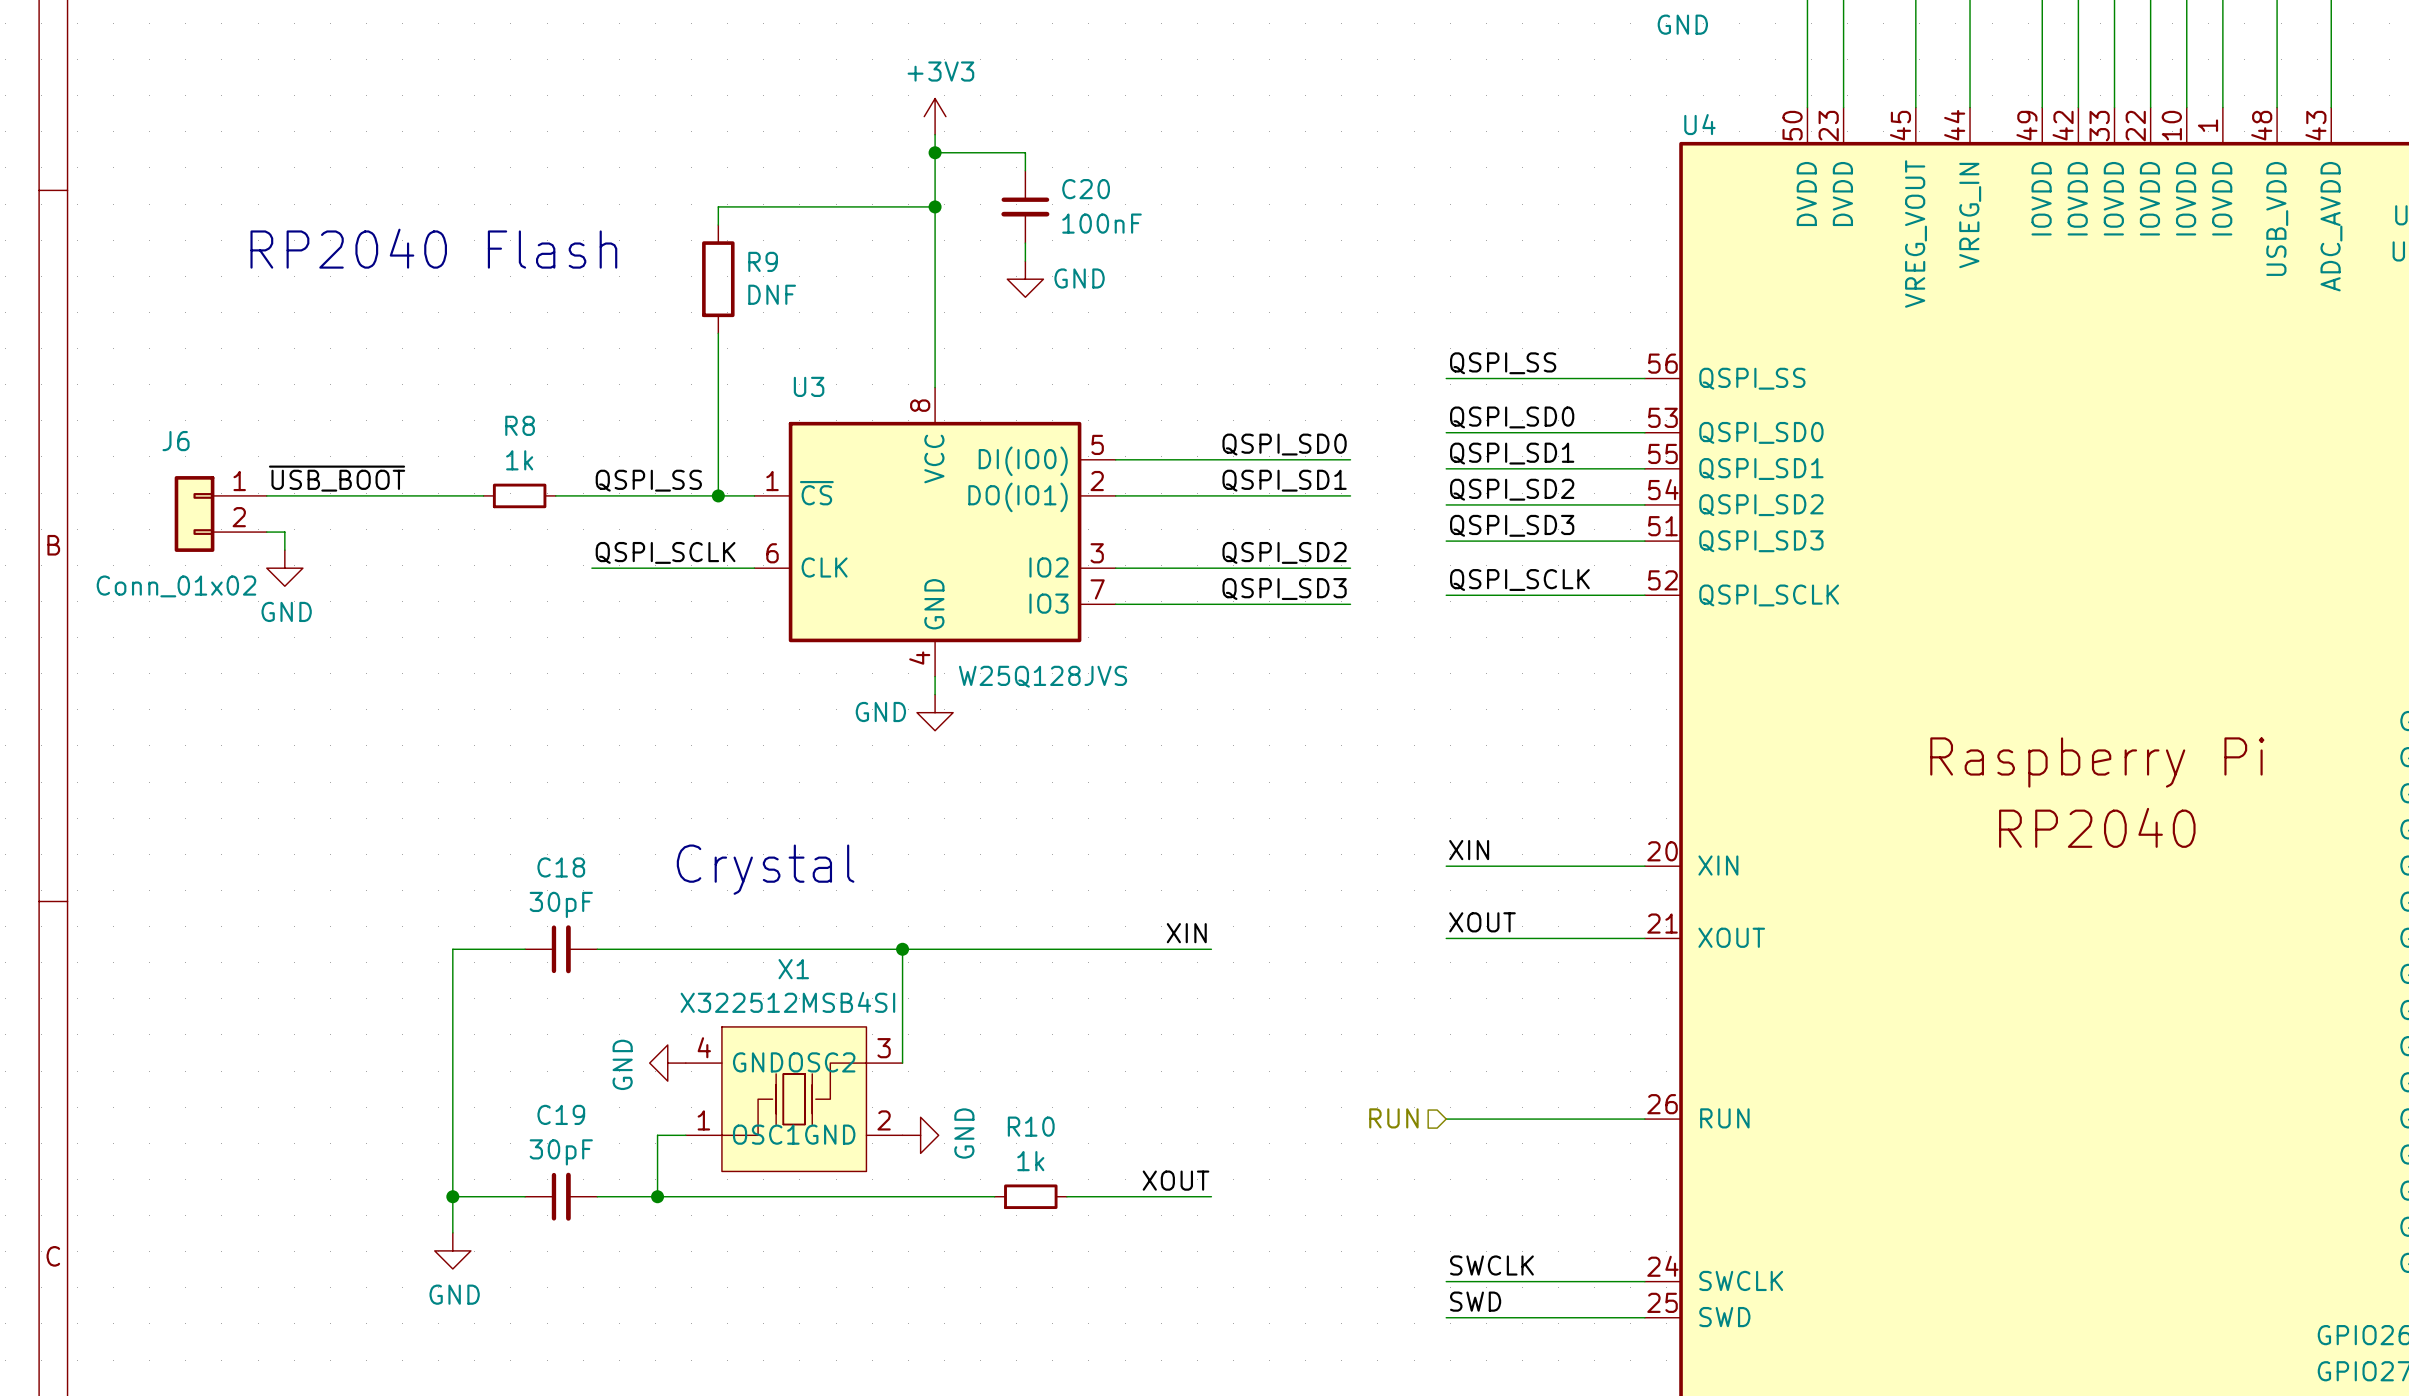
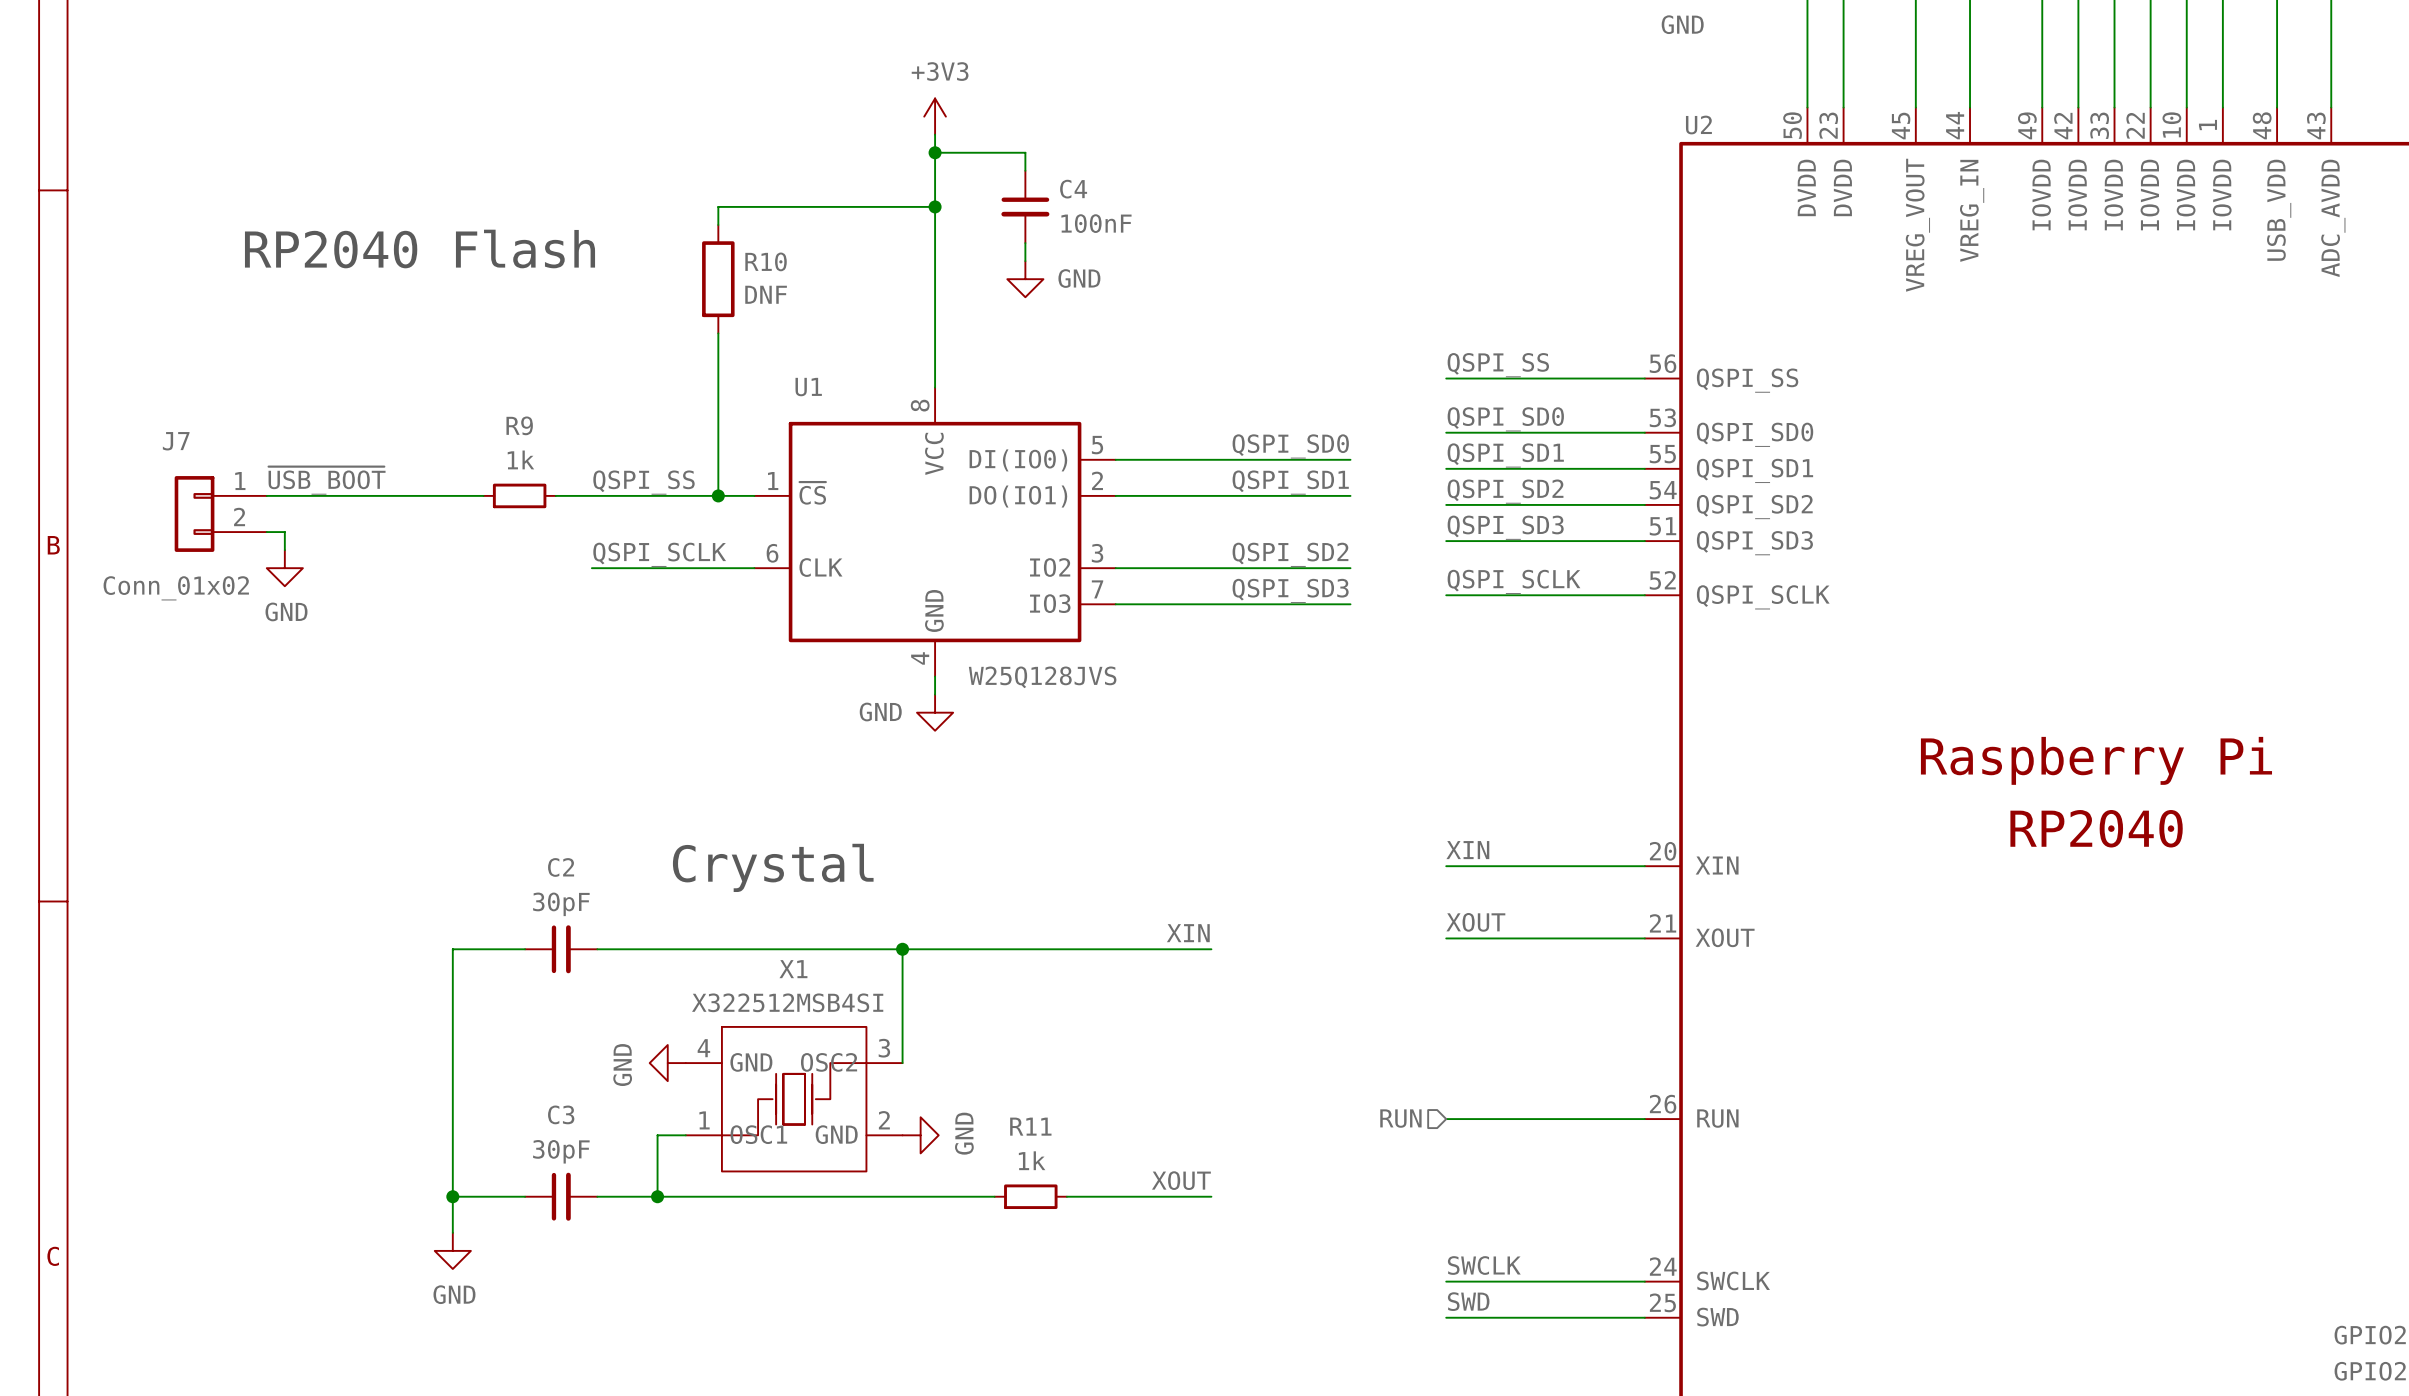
U4 name: U4 (1699, 124) -> U2 (1698, 125)
C20 name: C20 (1086, 189) -> C4 (1073, 189)
R9 name: R9 (763, 261) -> R10 (766, 261)
U3 name: U3 (809, 386) -> U1 (808, 387)
R8 name: R8 (520, 425) -> R9 (519, 425)
J6 name: J6 (176, 441) -> J7 (176, 441)
C18 name: C18 (561, 867) -> C2 (561, 867)
C19 name: C19 (561, 1114) -> C3 (561, 1114)
R10 name: R10 (1031, 1126) -> R11 (1030, 1126)

